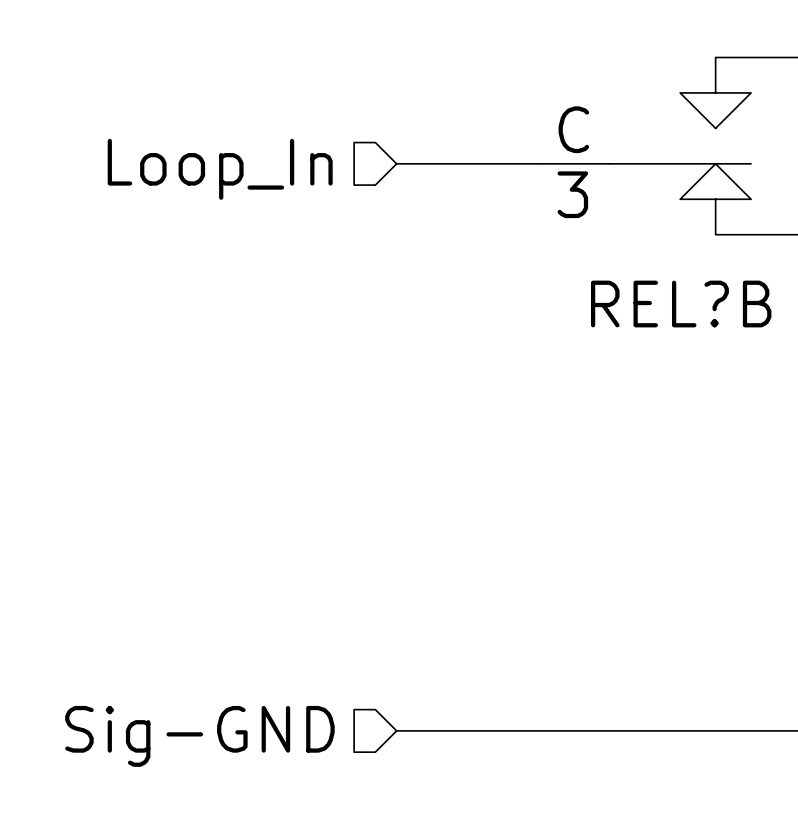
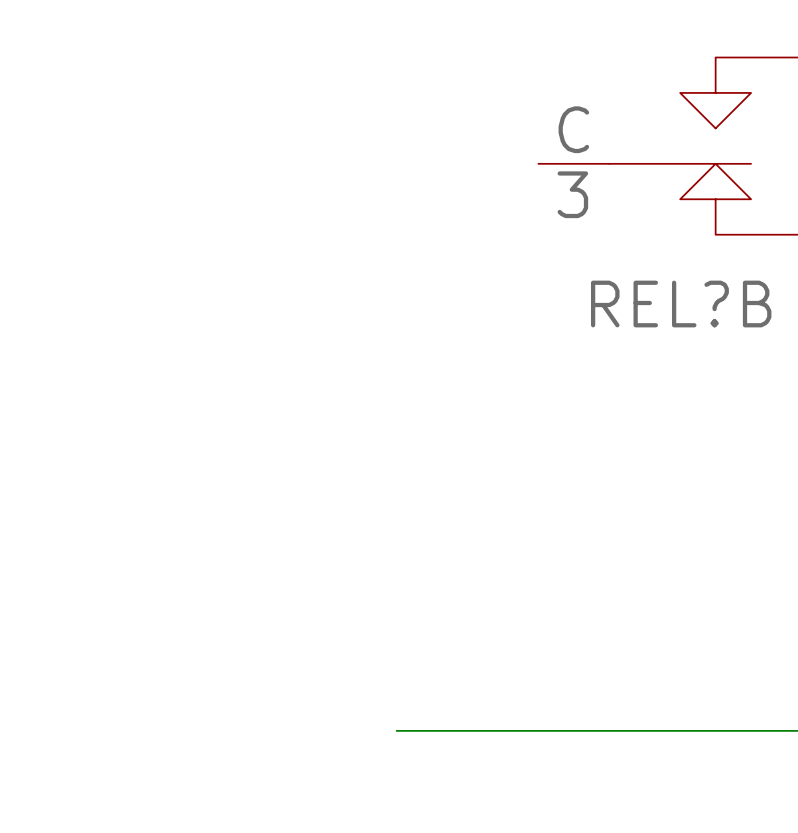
wire: (396, 163) (538, 163) -> none
hierarchical label: Loop_In (220, 169) -> none
hierarchical label: Sig-GND (199, 736) -> none

